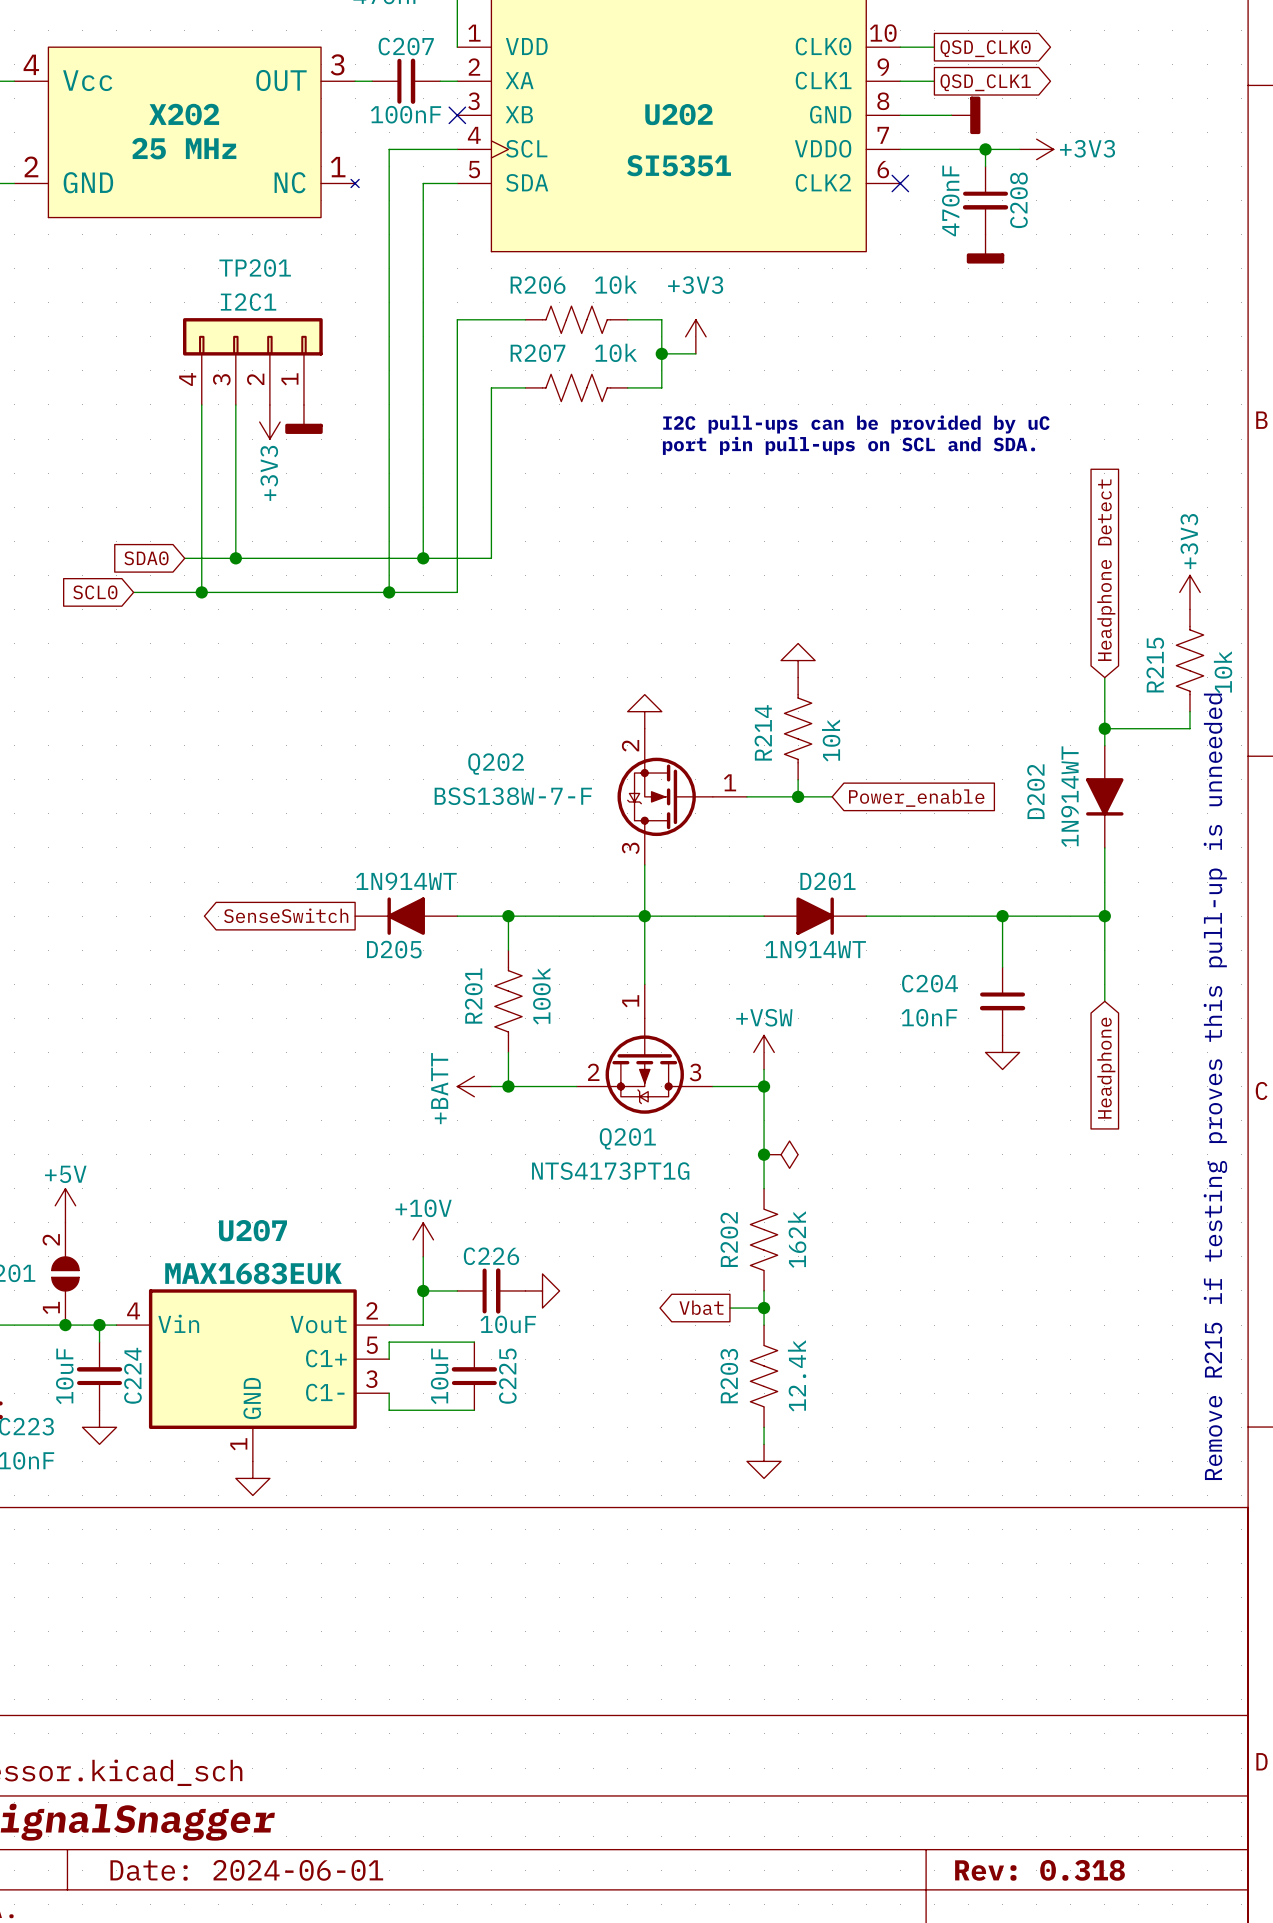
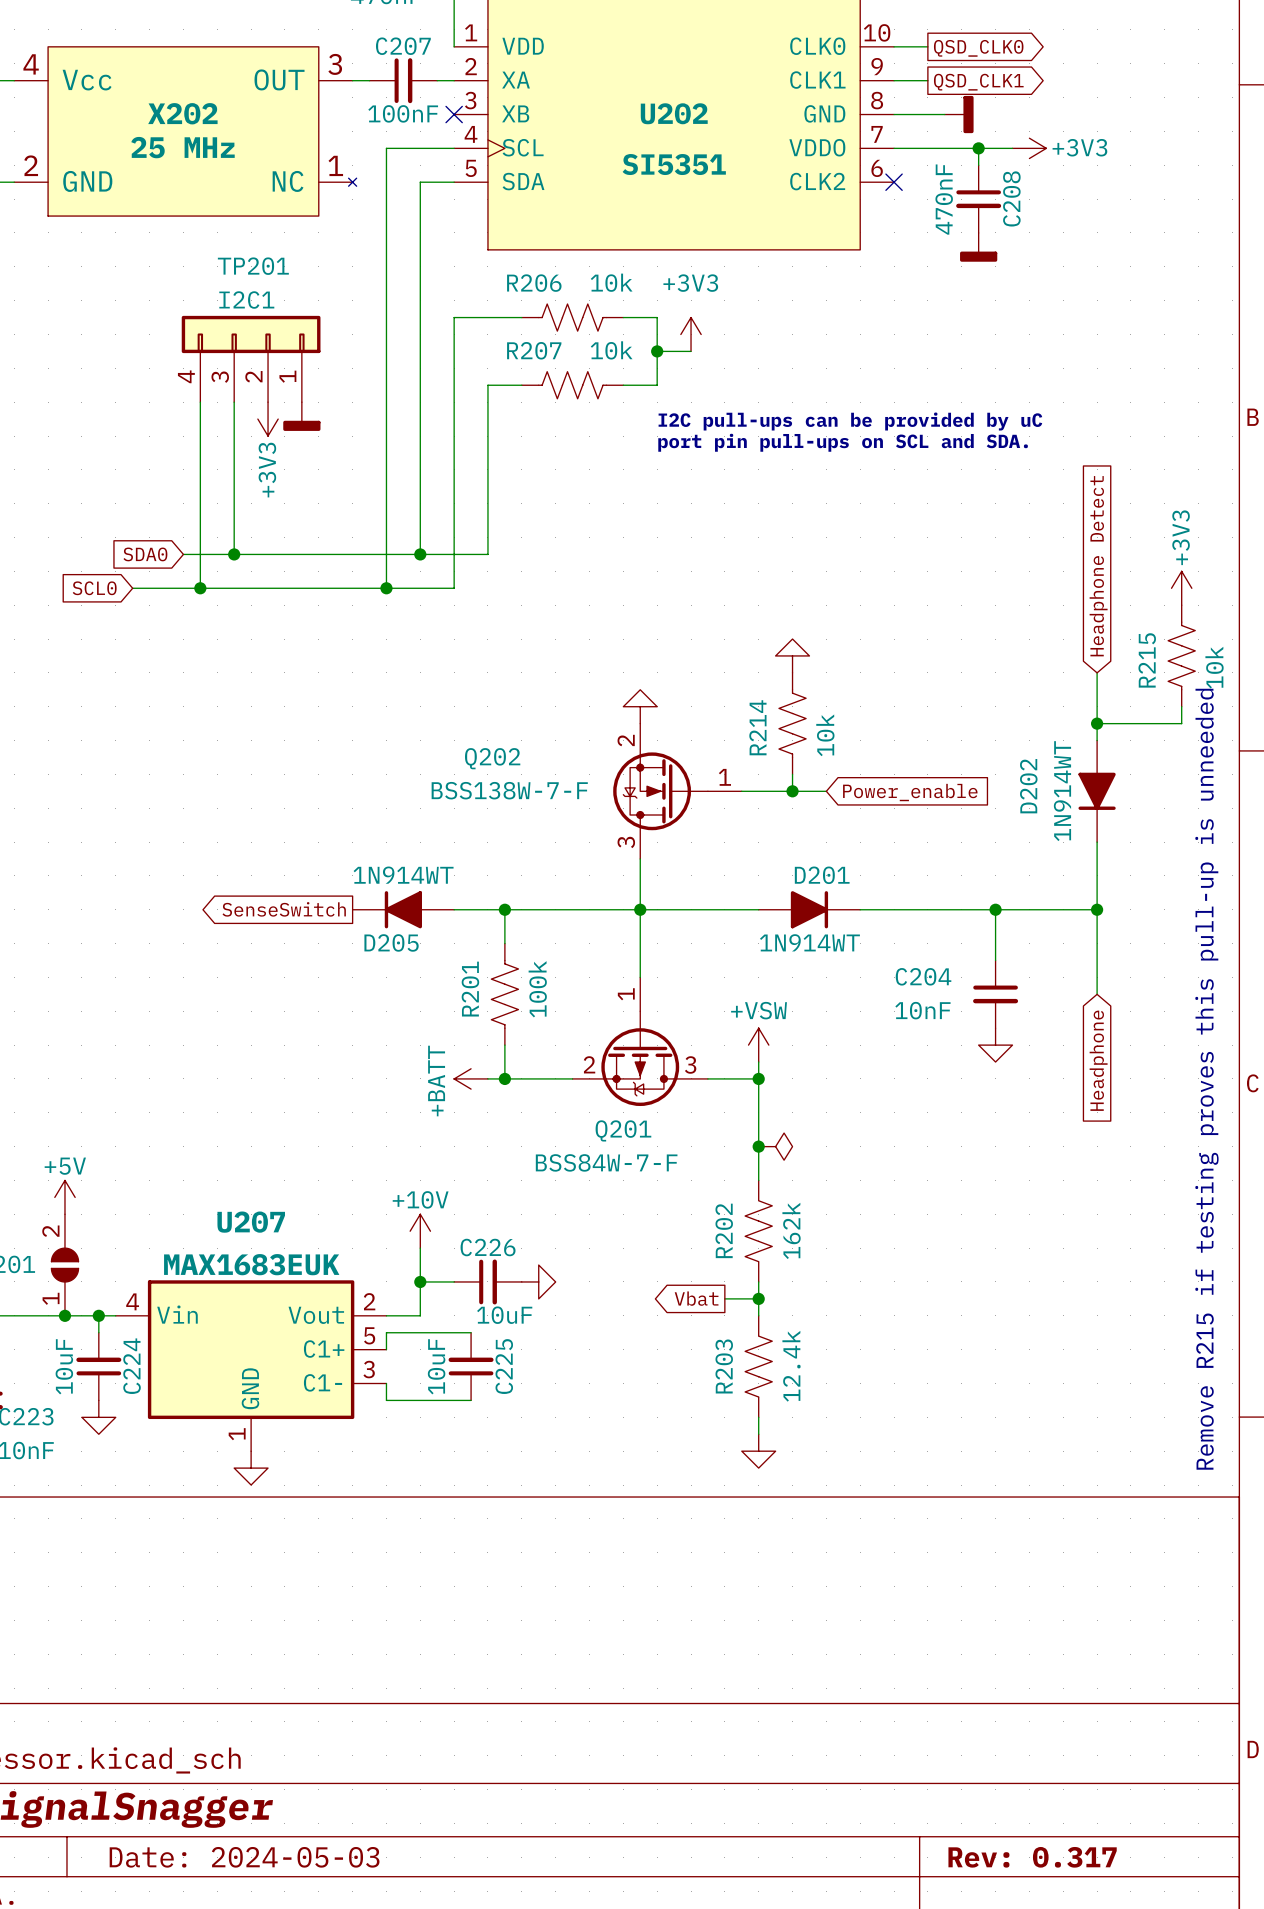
Q201 value: NTS4173PT1G (610, 1171) -> BSS84W-7-F (606, 1162)
title block: Date: 2024-06-01 (246, 1870) -> Date: 2024-05-03 (244, 1857)
title block: Rev: 0.318 (1040, 1870) -> Rev: 0.317 (1032, 1857)

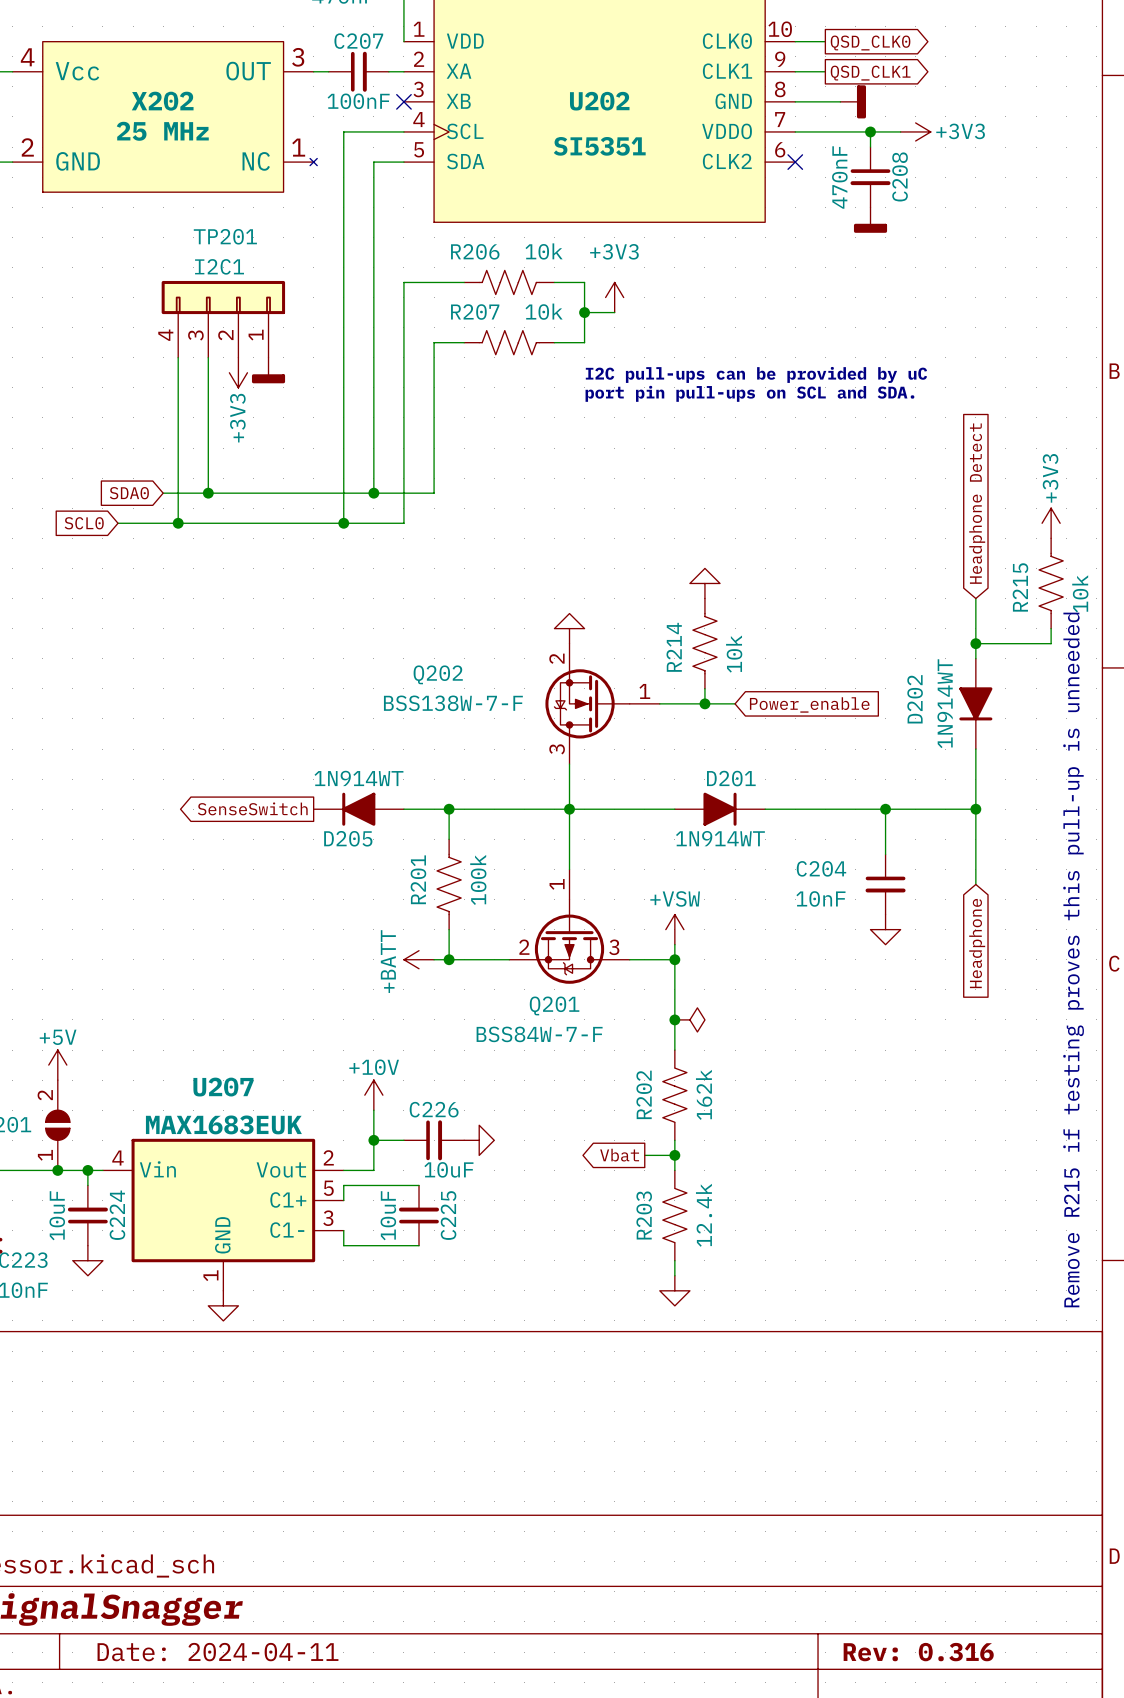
title block: Date: 2024-05-03 (244, 1857) -> Date: 2024-04-11 (217, 1652)
title block: Rev: 0.317 (1032, 1857) -> Rev: 0.316 (918, 1652)

